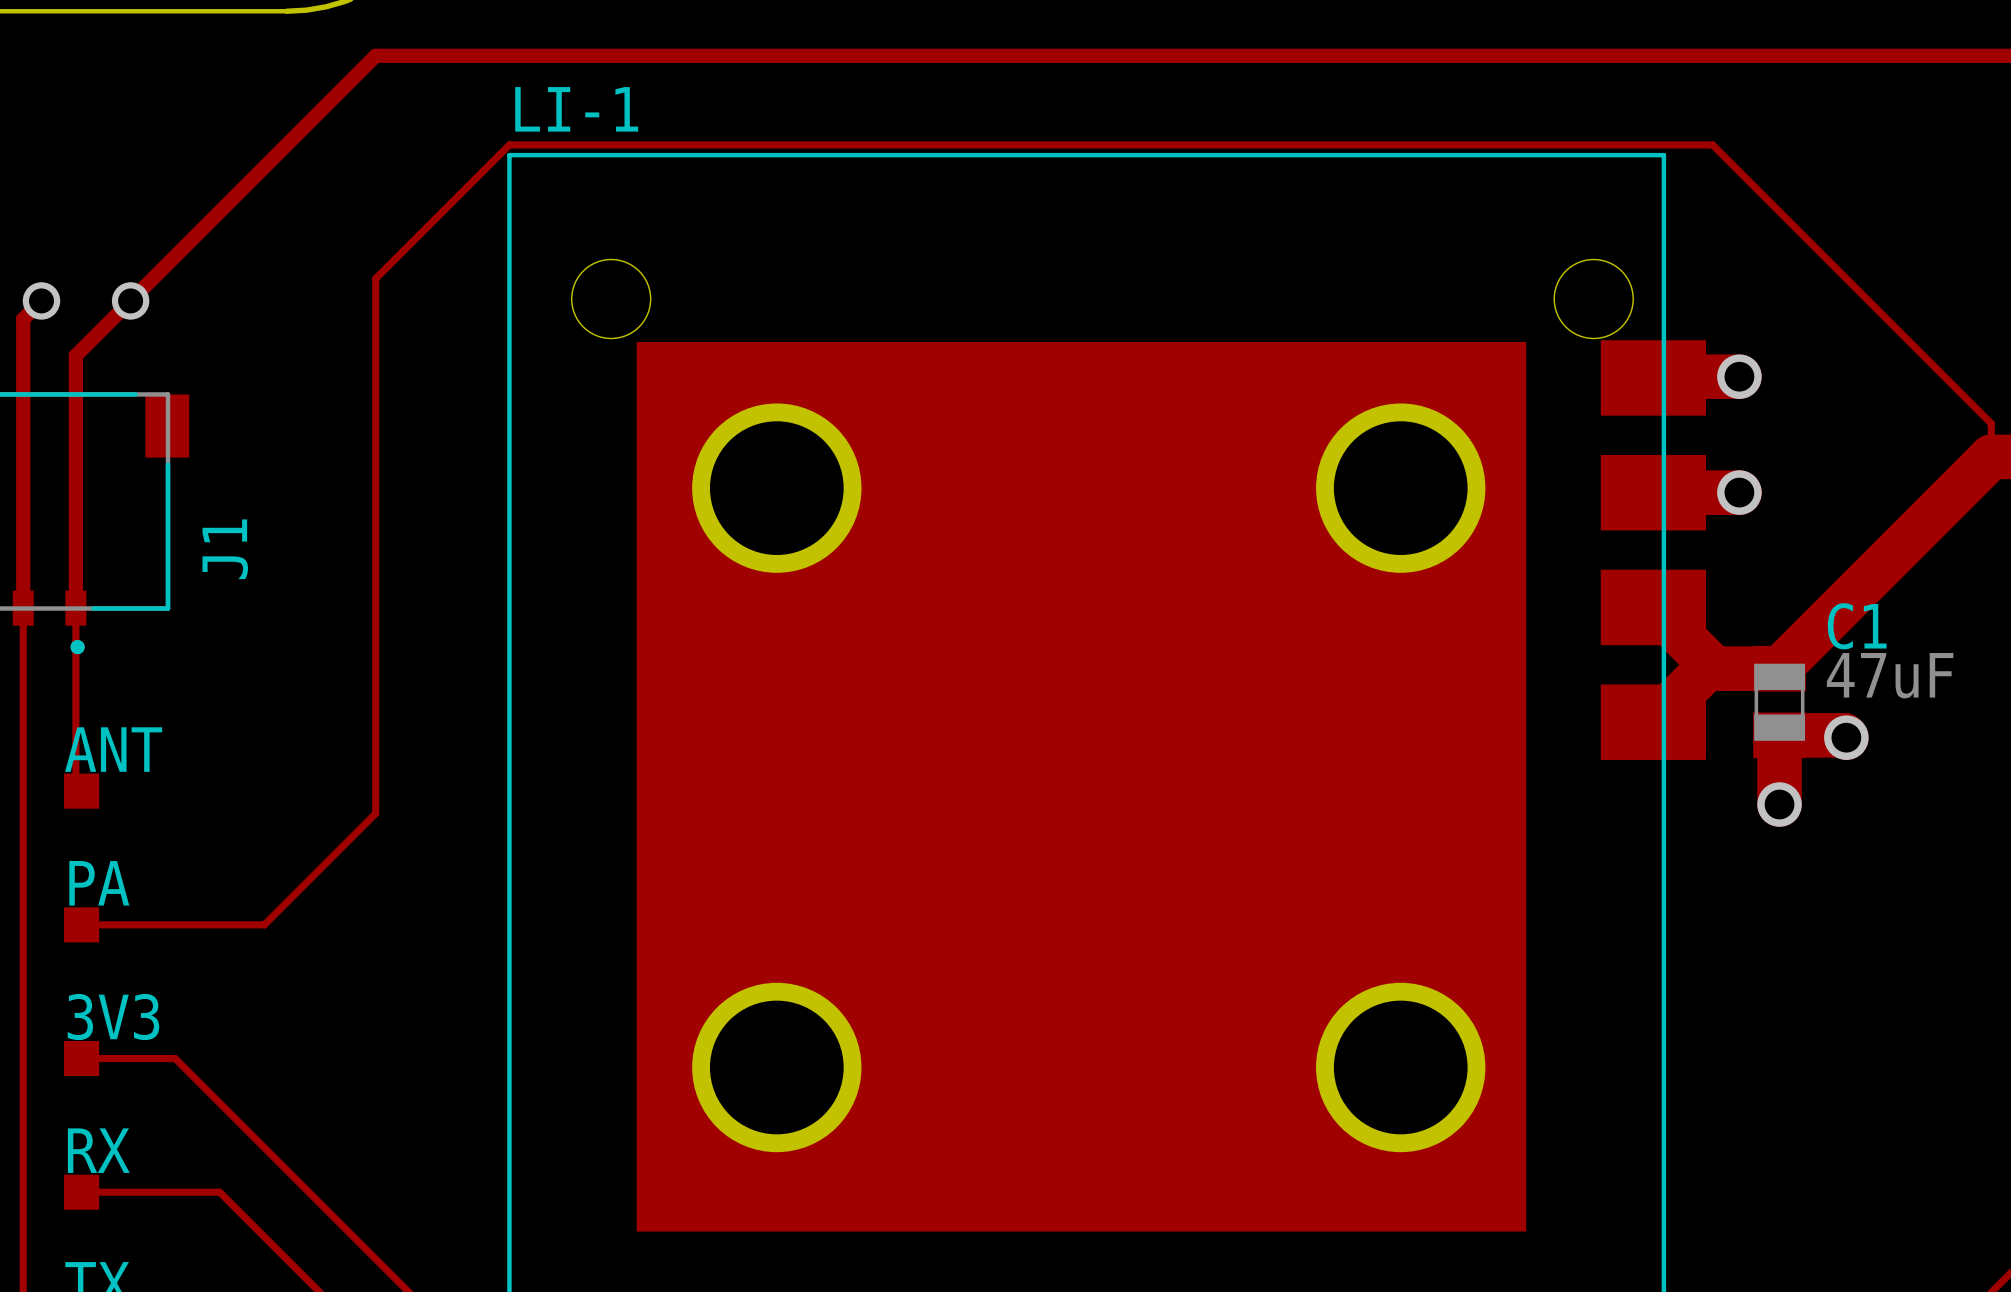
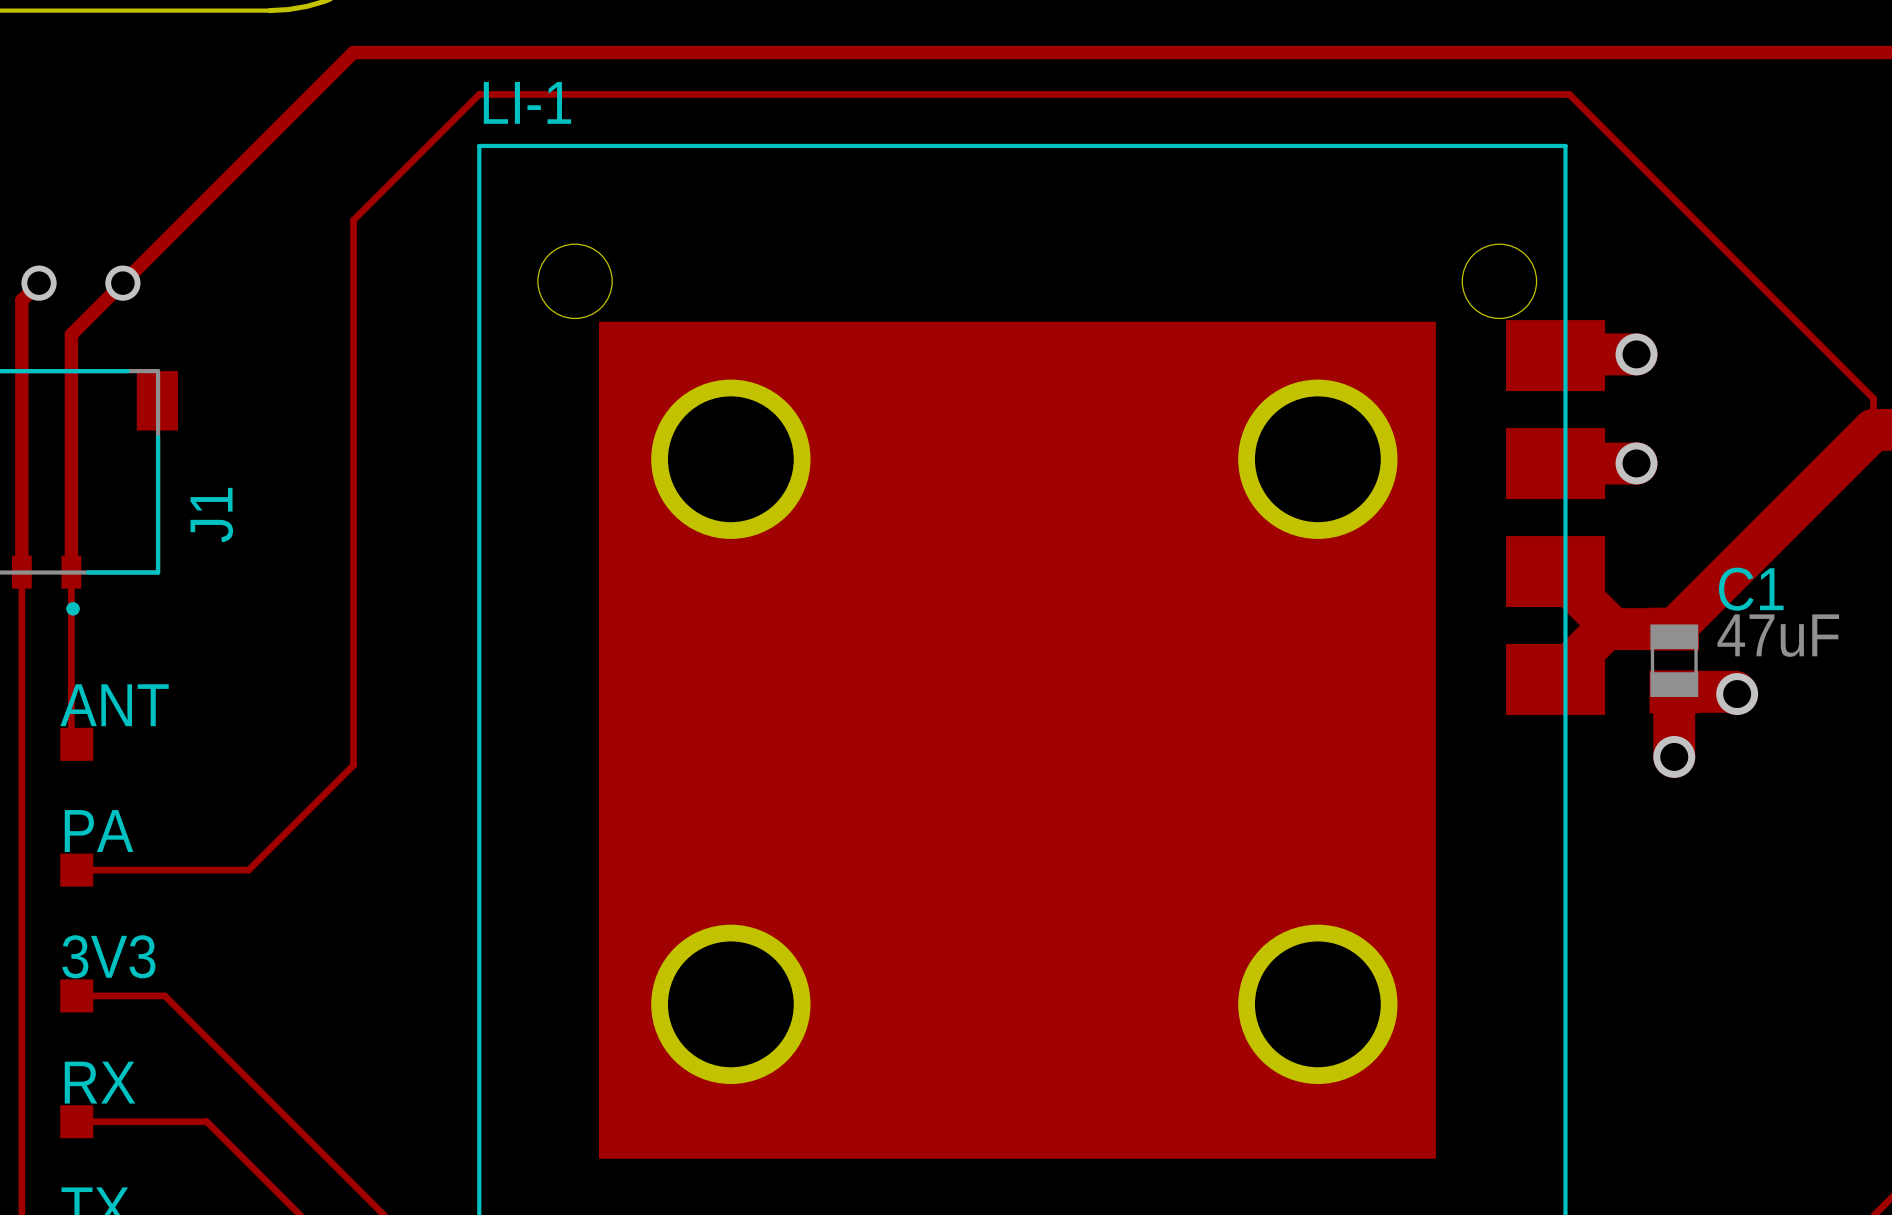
track: (1712, 144) (509, 144) (375, 278) -> (1611, 136) (1569, 94) (479, 94) (353, 220) (353, 262)

